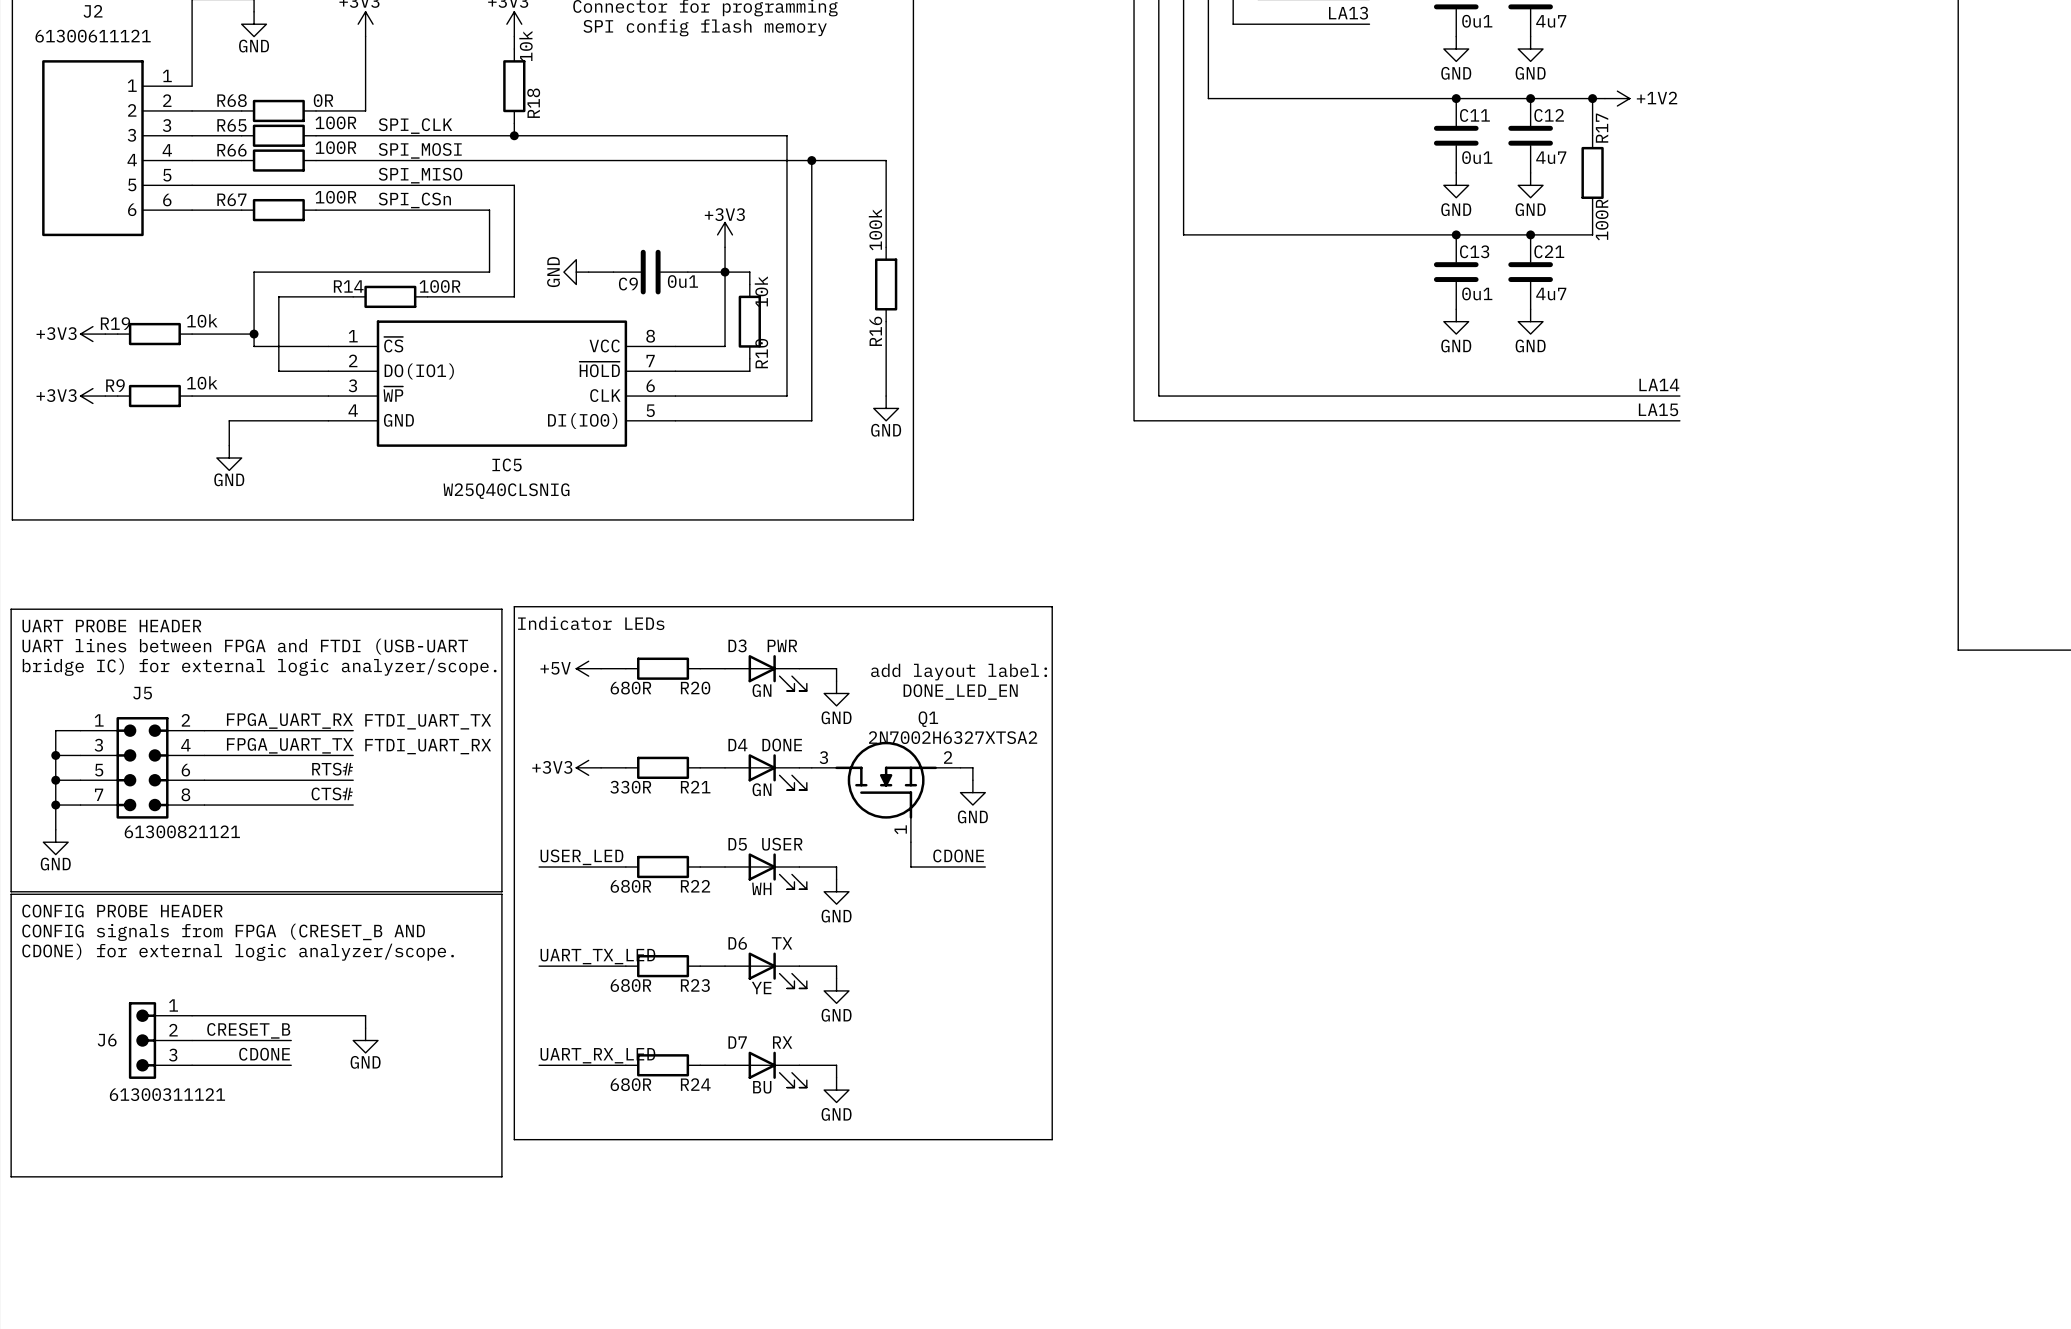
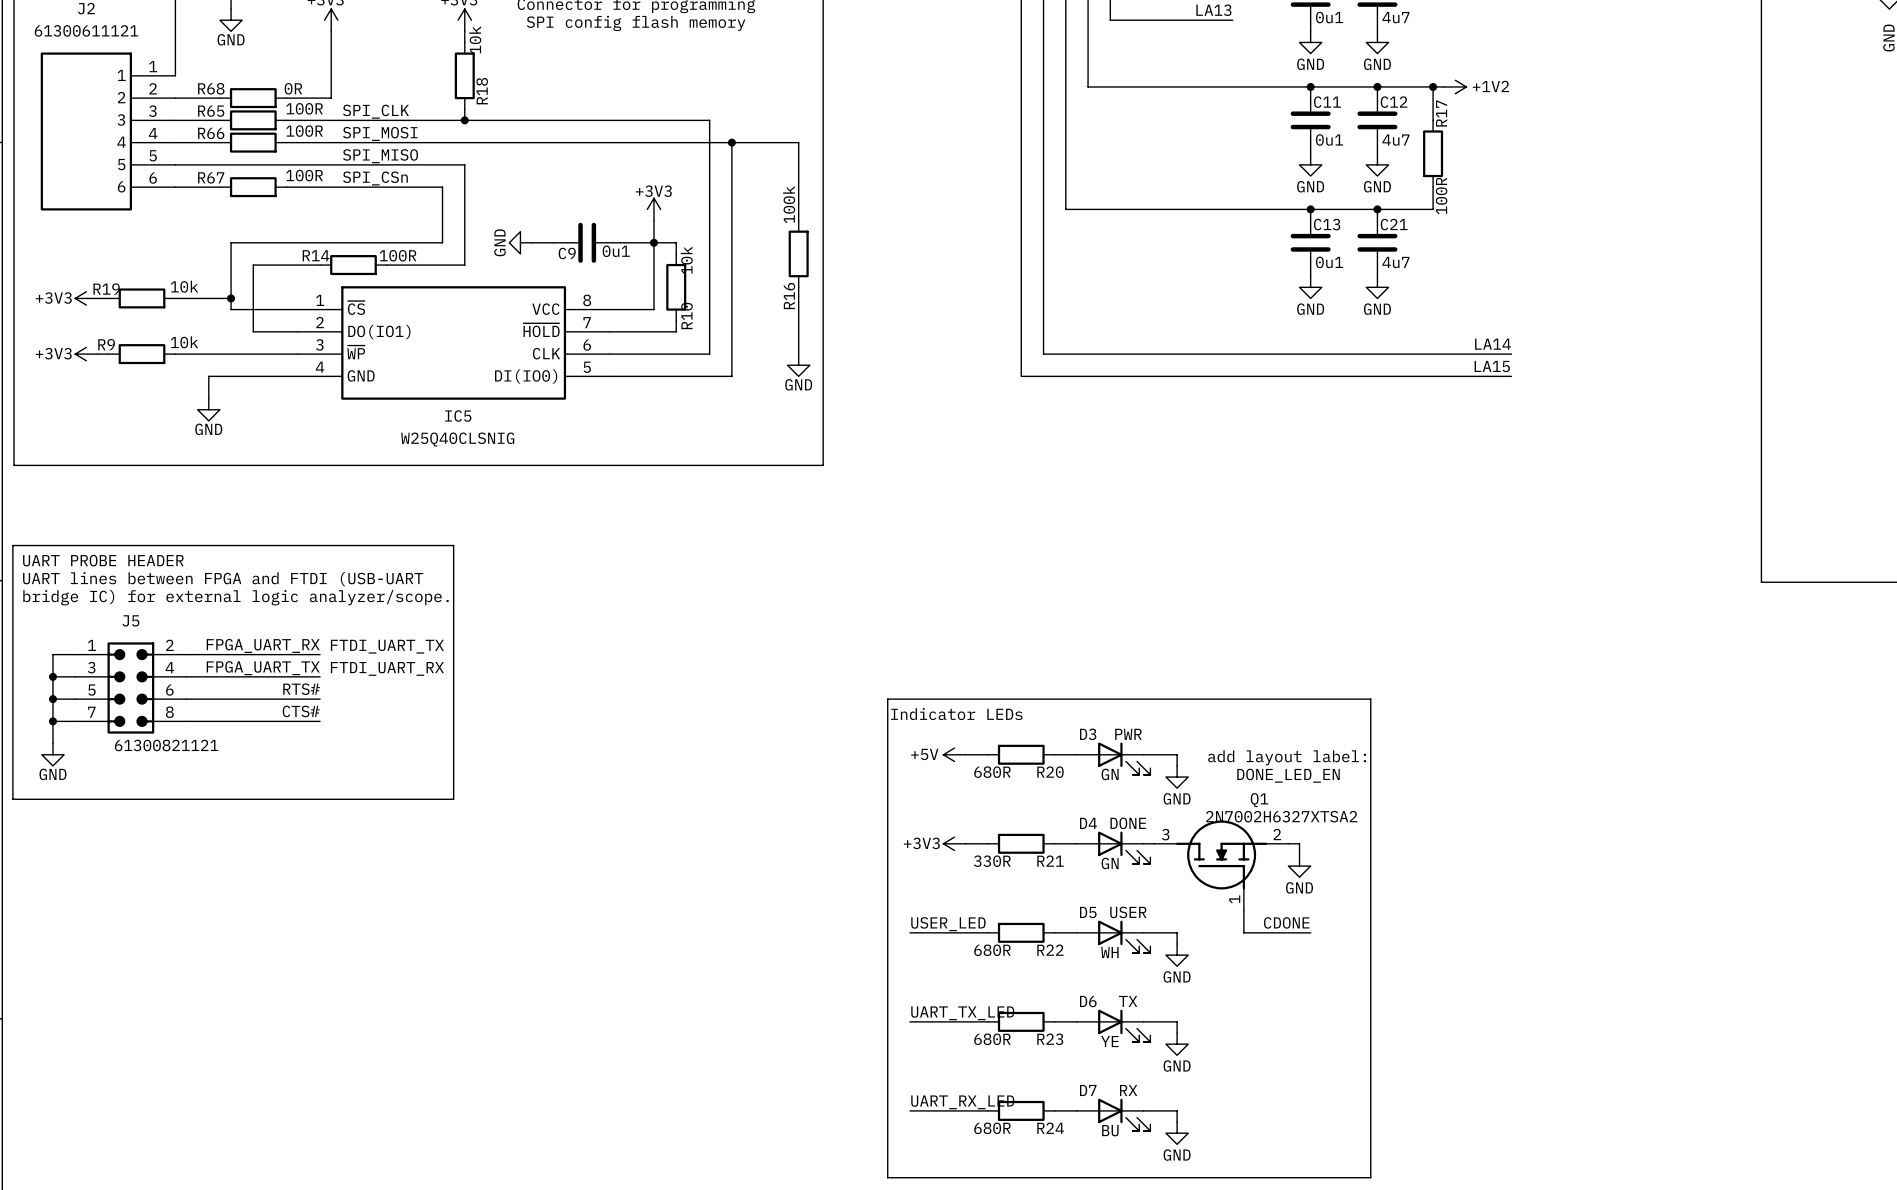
line: (514, 606) (1052, 606) (1052, 1139) (514, 1139) (514, 606) -> none
text: Indicator LEDs (591, 623) -> none
power symbol: +5V (588, 668) -> none
wire: (601, 668) (625, 668) -> none
R20 position: (663, 668) -> (1021, 754)
wire: (700, 668) (725, 668) -> none
wire: (799, 668) (836, 668) (836, 681) -> none
text: add layout label: (959, 672) -> none
D3 position: (765, 673) -> (1113, 758)
text: GN (761, 690) -> none
text: DONE_LED_EN (960, 692) -> none
power symbol: GND (836, 693) -> none
power symbol: +3V3 (588, 767) -> none
wire: (601, 767) (625, 767) -> none
R21 position: (663, 767) -> (1021, 843)
wire: (700, 767) (725, 767) -> none
wire: (799, 767) (811, 767) -> none
wire: (960, 767) (972, 767) (972, 780) -> none
D4 position: (765, 772) -> (1113, 847)
line: none -> (887, 699) (1370, 699) (1370, 1177) (887, 1177) (887, 699)
text: GN (761, 789) -> none
Q1 position: (886, 792) -> (1221, 865)
power symbol: GND (972, 792) -> none
text: none -> Indicator LEDs (956, 714)
wire: (910, 842) (910, 866) (985, 866) -> none
power symbol: none -> +5V (954, 754)
wire: none -> (965, 754) (987, 754)
wire: none -> (1054, 754) (1076, 754)
wire: none -> (1143, 754) (1177, 754) (1177, 765)
text: none -> add layout label: (1287, 757)
label: CDONE (958, 855) -> none
label: USER_LED (581, 857) -> none
text: none -> GN (1110, 774)
text: none -> DONE_LED_EN (1288, 775)
wire: (539, 866) (625, 866) -> none
R22 position: (663, 866) -> (1021, 932)
wire: (700, 866) (725, 866) -> none
wire: (799, 866) (836, 866) (836, 879) -> none
power symbol: none -> GND (1177, 777)
D5 position: (765, 871) -> (1113, 936)
text: WH (761, 888) -> none
power symbol: GND (836, 891) -> none
line: (11, 894) (11, 1176) (501, 1176) (501, 894) (11, 894) -> none
text: CONFIG PROBE HEADER (122, 911) -> none
text: CONFIG signals from FPGA (CRESET_B AND (223, 932) -> none
power symbol: none -> +3V3 (954, 843)
wire: none -> (965, 843) (987, 843)
wire: none -> (1054, 843) (1076, 843)
wire: none -> (1143, 843) (1154, 843)
wire: none -> (1288, 843) (1299, 843) (1299, 854)
text: CDONE) for external logic analyzer/scope. (238, 952) -> none
label: UART_TX_LED (597, 956) -> none
text: none -> GN (1110, 863)
wire: (539, 966) (625, 966) -> none
R23 position: (663, 966) -> (1021, 1021)
wire: (700, 966) (725, 966) -> none
wire: (799, 966) (836, 966) (836, 978) -> none
power symbol: none -> GND (1299, 866)
D6 position: (765, 970) -> (1113, 1025)
text: YE (761, 988) -> none
power symbol: GND (836, 990) -> none
wire: (192, 1015) (365, 1015) (365, 1028) -> none
wire: none -> (1243, 910) (1243, 932) (1310, 932)
label: none -> CDONE (1286, 922)
label: CRESET_B (248, 1030) -> none
label: none -> USER_LED (948, 924)
J6: (160, 1040) -> none
wire: (192, 1040) (291, 1040) -> none
power symbol: GND (365, 1040) -> none
wire: none -> (909, 932) (987, 932)
wire: none -> (1054, 932) (1076, 932)
wire: none -> (1143, 932) (1177, 932) (1177, 943)
label: CDONE (264, 1054) -> none
label: UART_RX_LED (597, 1055) -> none
text: none -> WH (1109, 952)
wire: (192, 1065) (291, 1065) -> none
wire: (539, 1065) (625, 1065) -> none
R24 position: (663, 1065) -> (1021, 1110)
wire: (700, 1065) (725, 1065) -> none
wire: (799, 1065) (836, 1065) (836, 1077) -> none
power symbol: none -> GND (1177, 955)
D7 position: (765, 1069) -> (1113, 1114)
text: BU (762, 1087) -> none
power symbol: GND (836, 1090) -> none
text: 61300311121 (167, 1094) -> none
label: none -> UART_TX_LED (962, 1013)
wire: none -> (909, 1021) (987, 1021)
wire: none -> (1054, 1021) (1076, 1021)
wire: none -> (1143, 1021) (1177, 1021) (1177, 1033)
text: none -> YE (1109, 1041)
power symbol: none -> GND (1177, 1044)
label: none -> UART_RX_LED (962, 1102)
wire: none -> (909, 1110) (987, 1110)
wire: none -> (1054, 1110) (1076, 1110)
wire: none -> (1143, 1110) (1177, 1110) (1177, 1122)
text: none -> BU (1110, 1130)
power symbol: none -> GND (1177, 1133)

